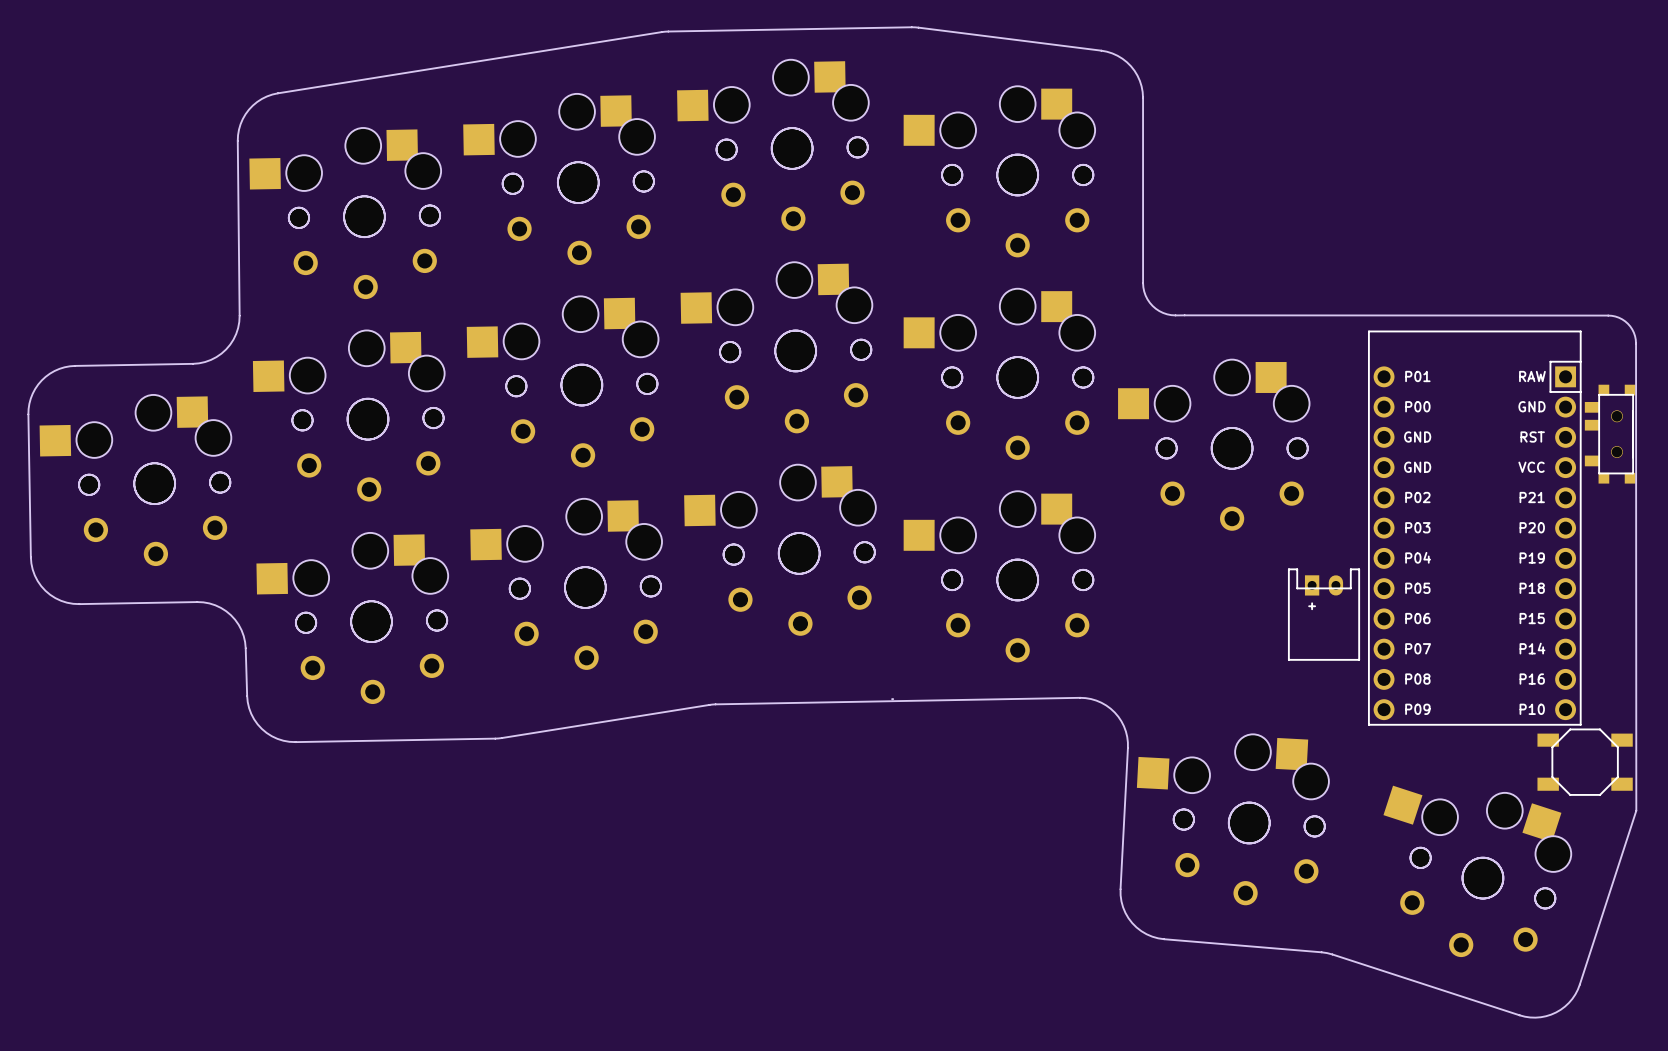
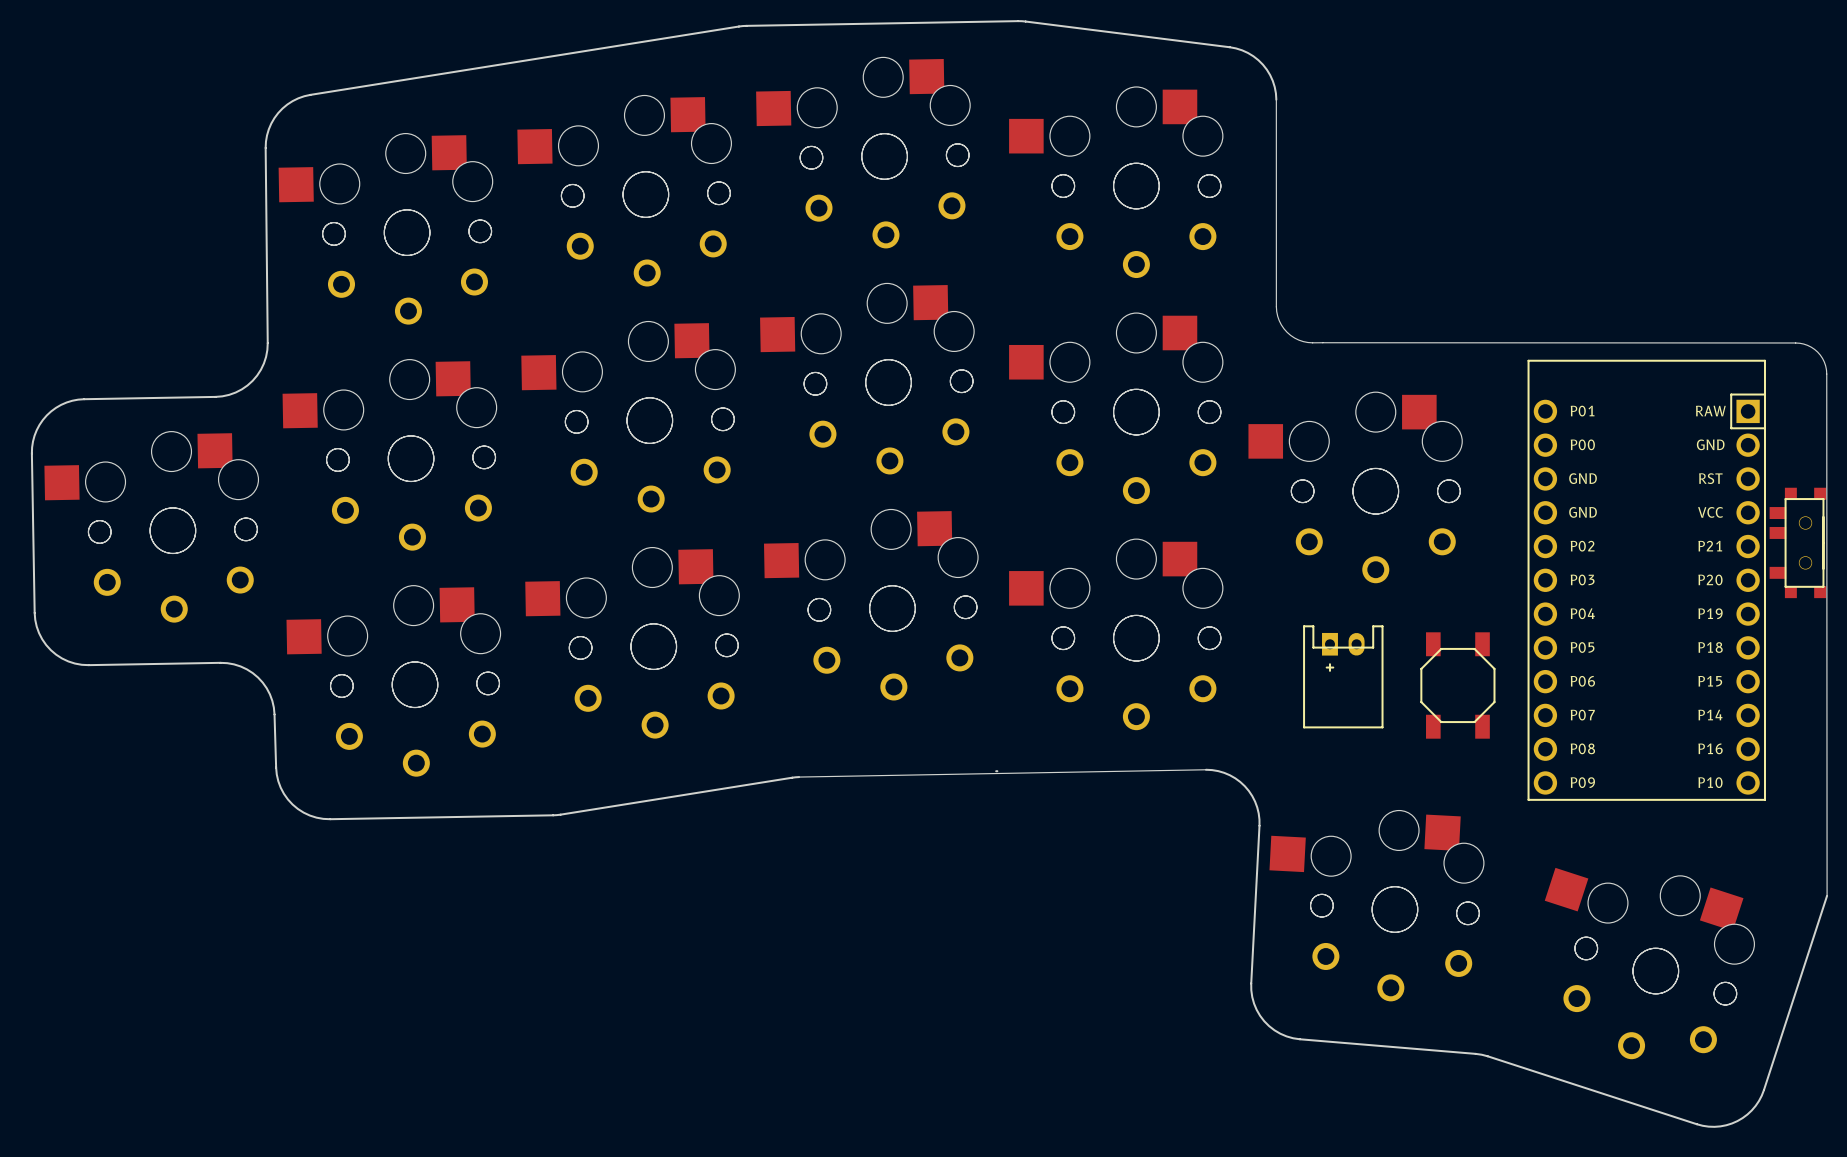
part position: (1610, 434) -> (1797, 542)
part position: (1324, 614) -> (1343, 676)
part: none -> (1457, 685)
part: (1585, 762) -> none

